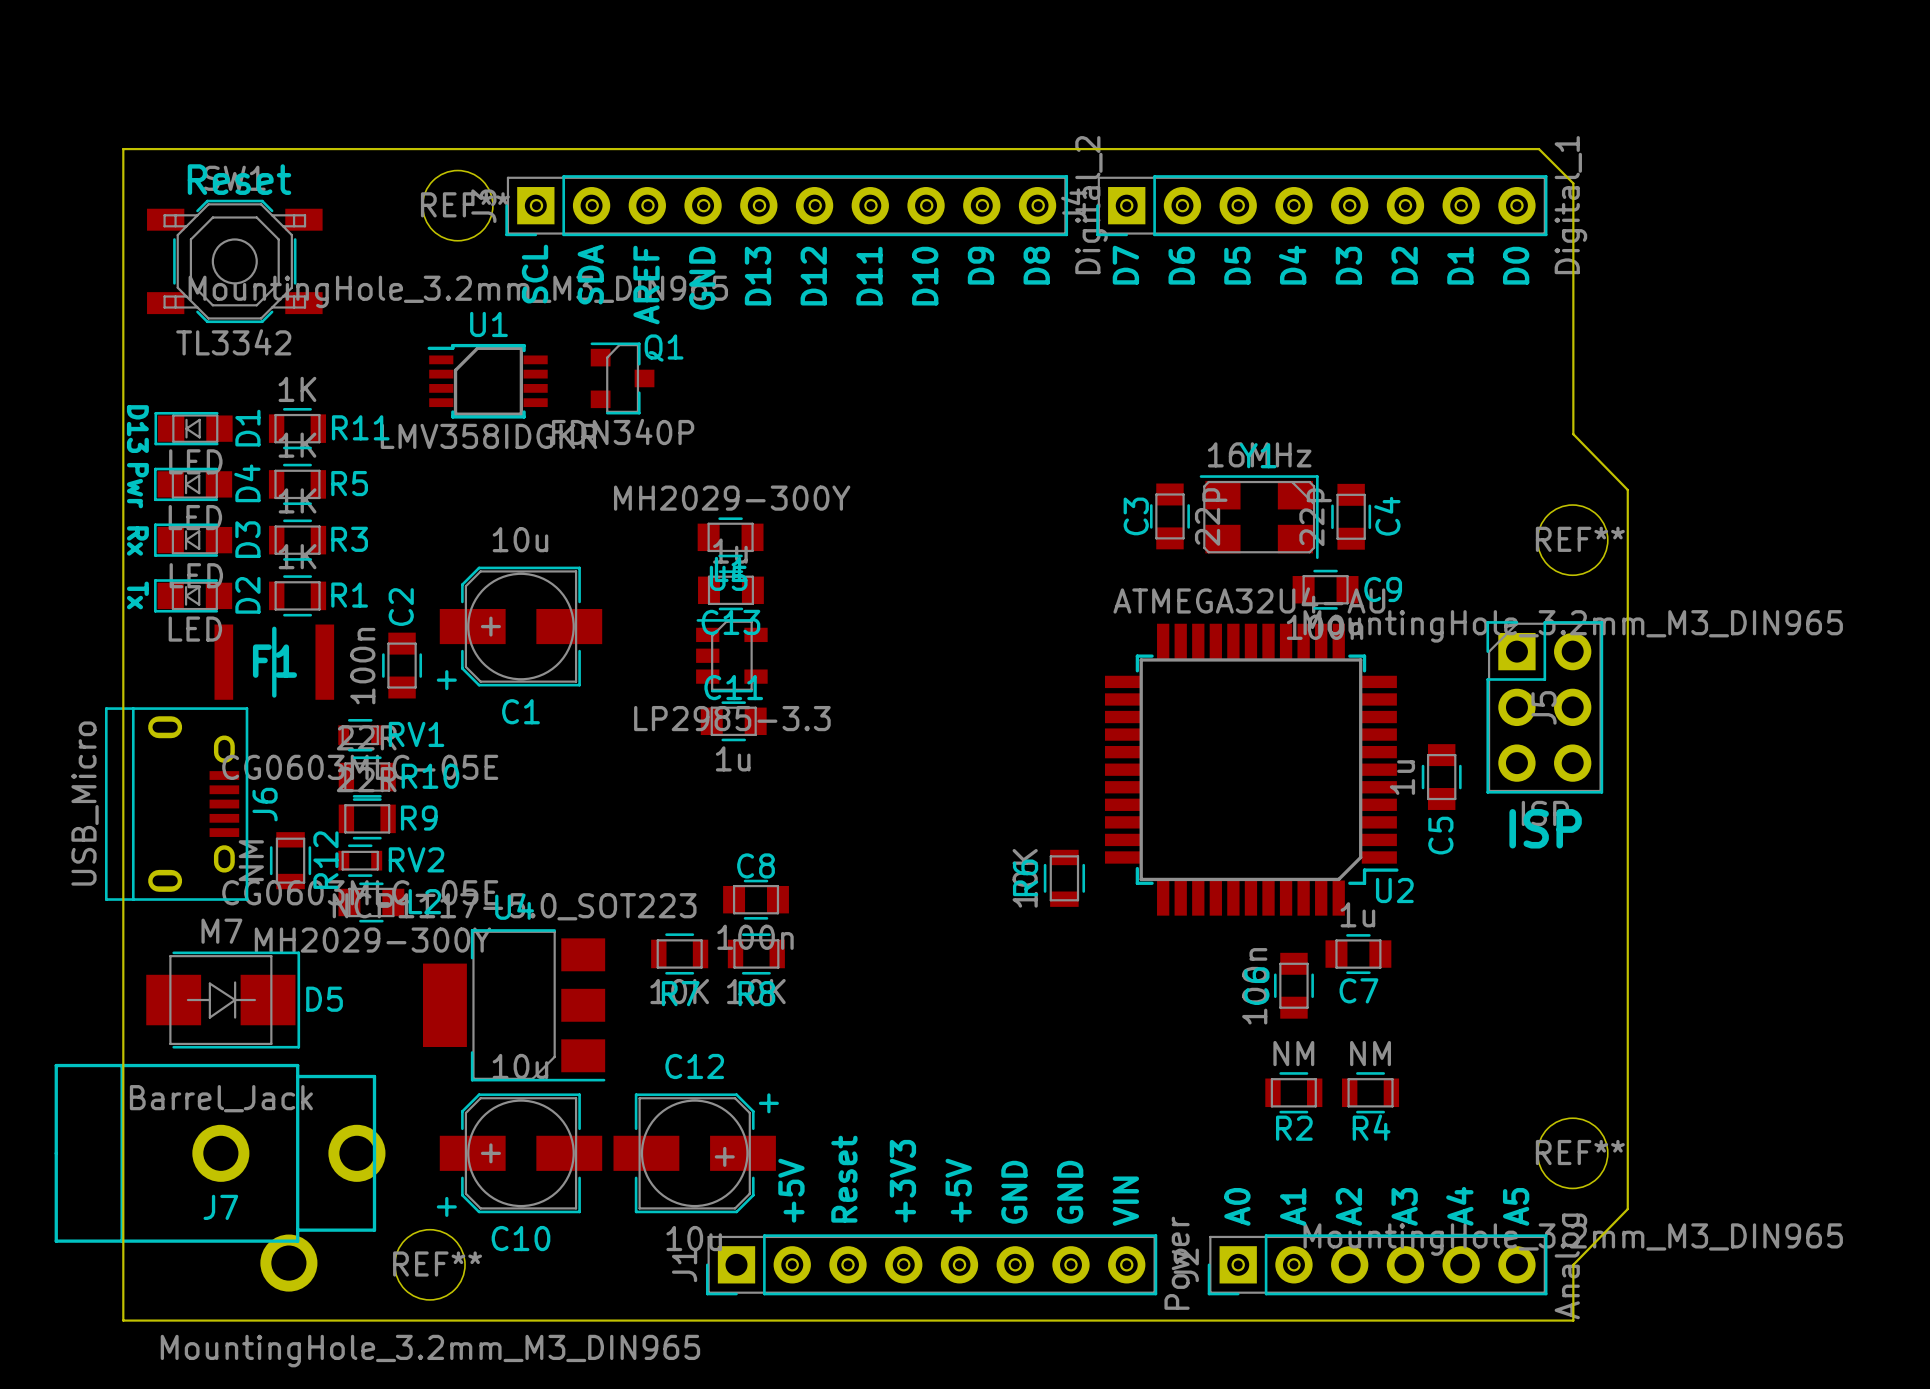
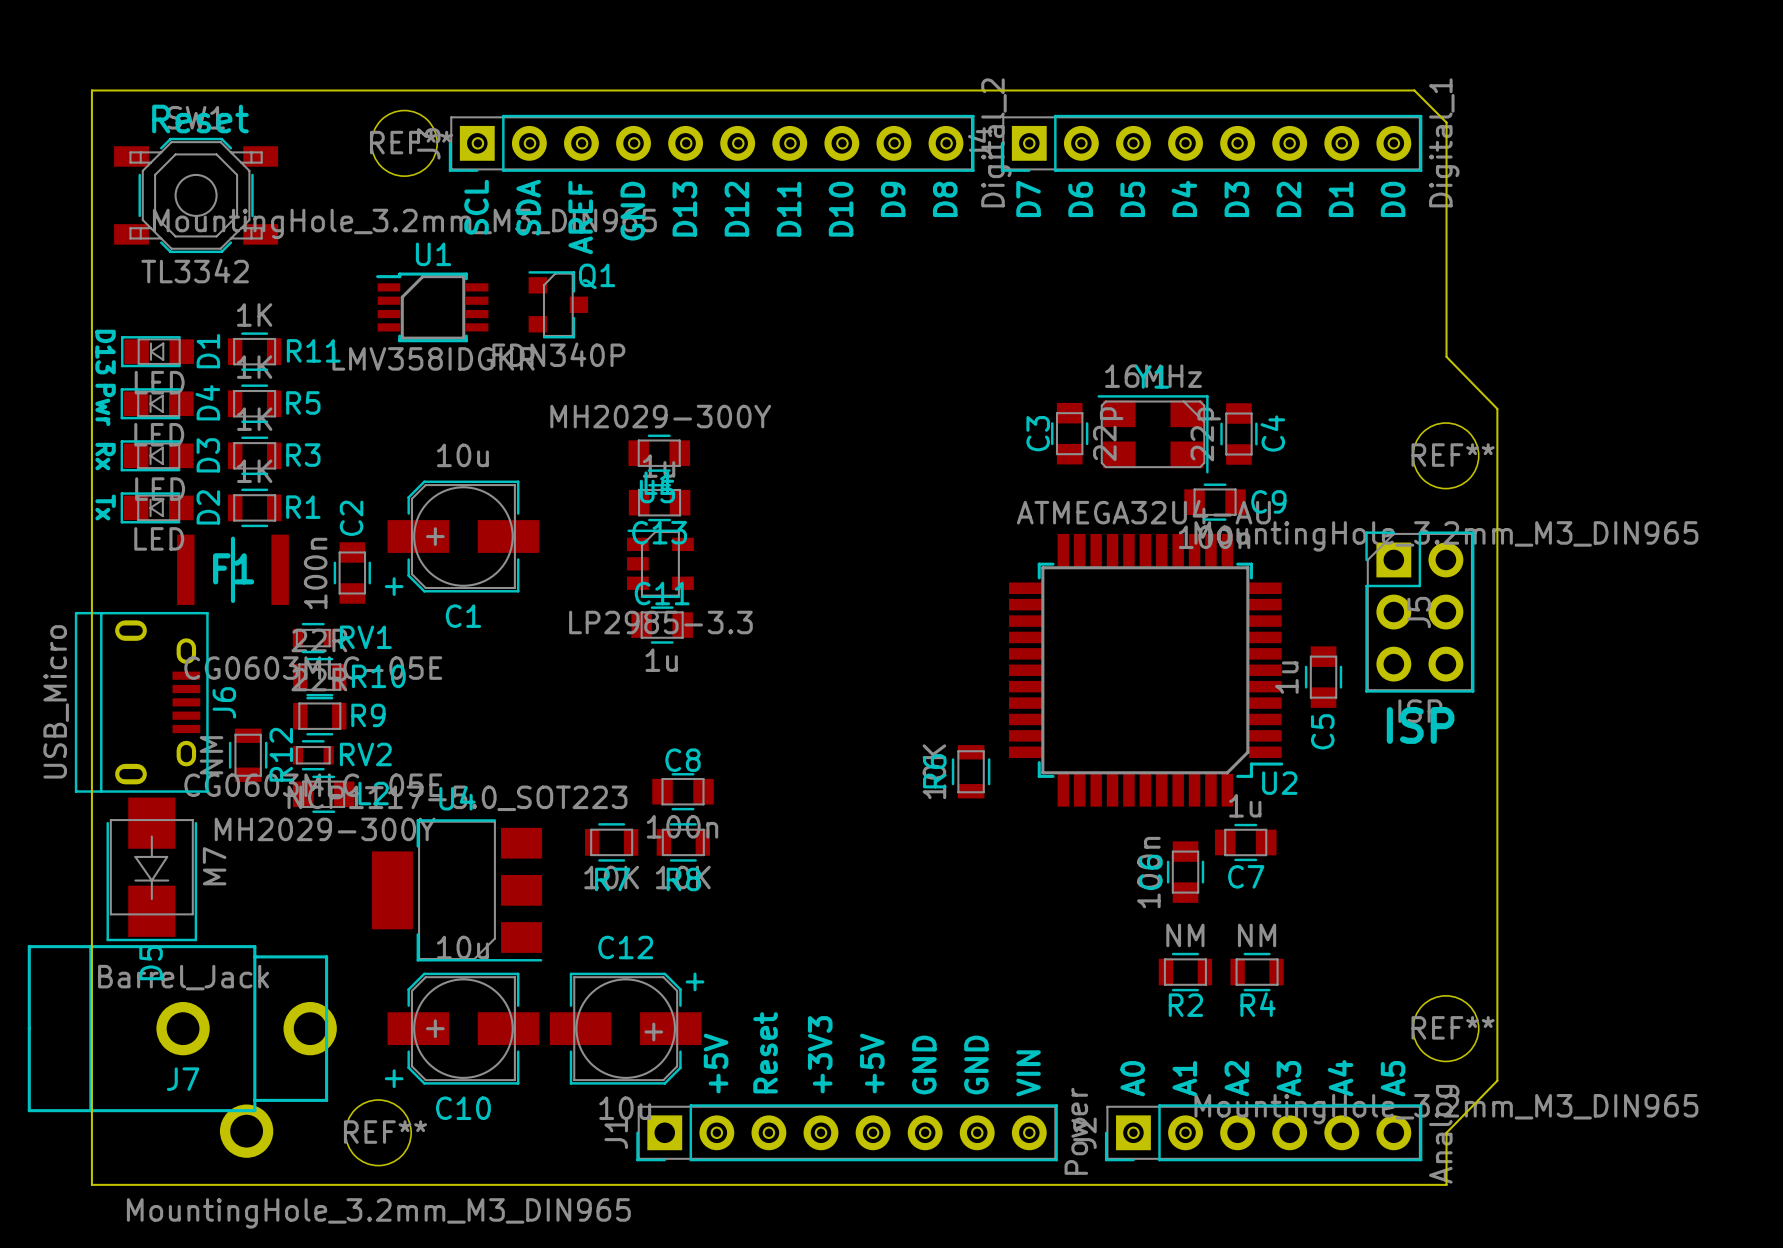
D5 rotation: 0° (223, 1000) -> 90° clockwise (151, 869)

